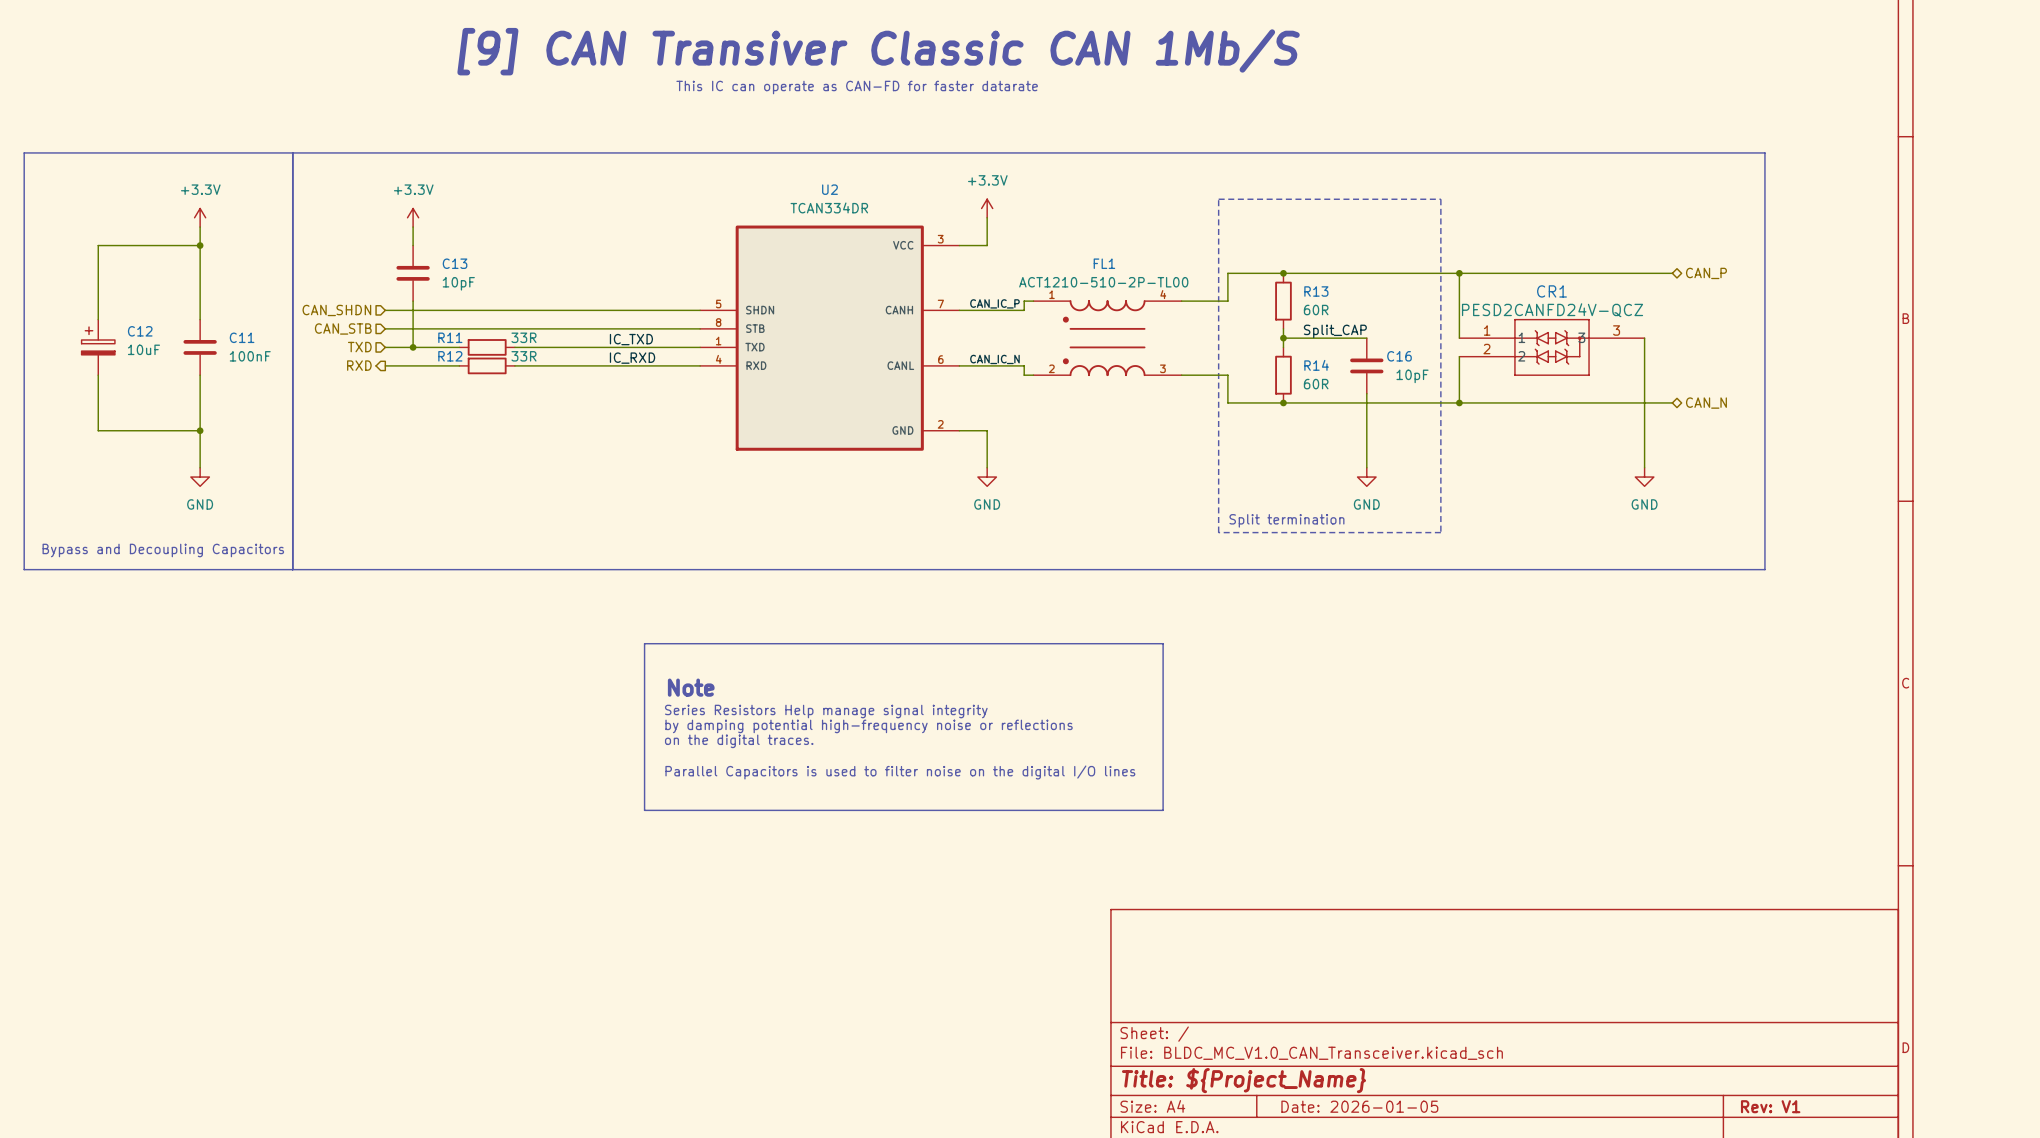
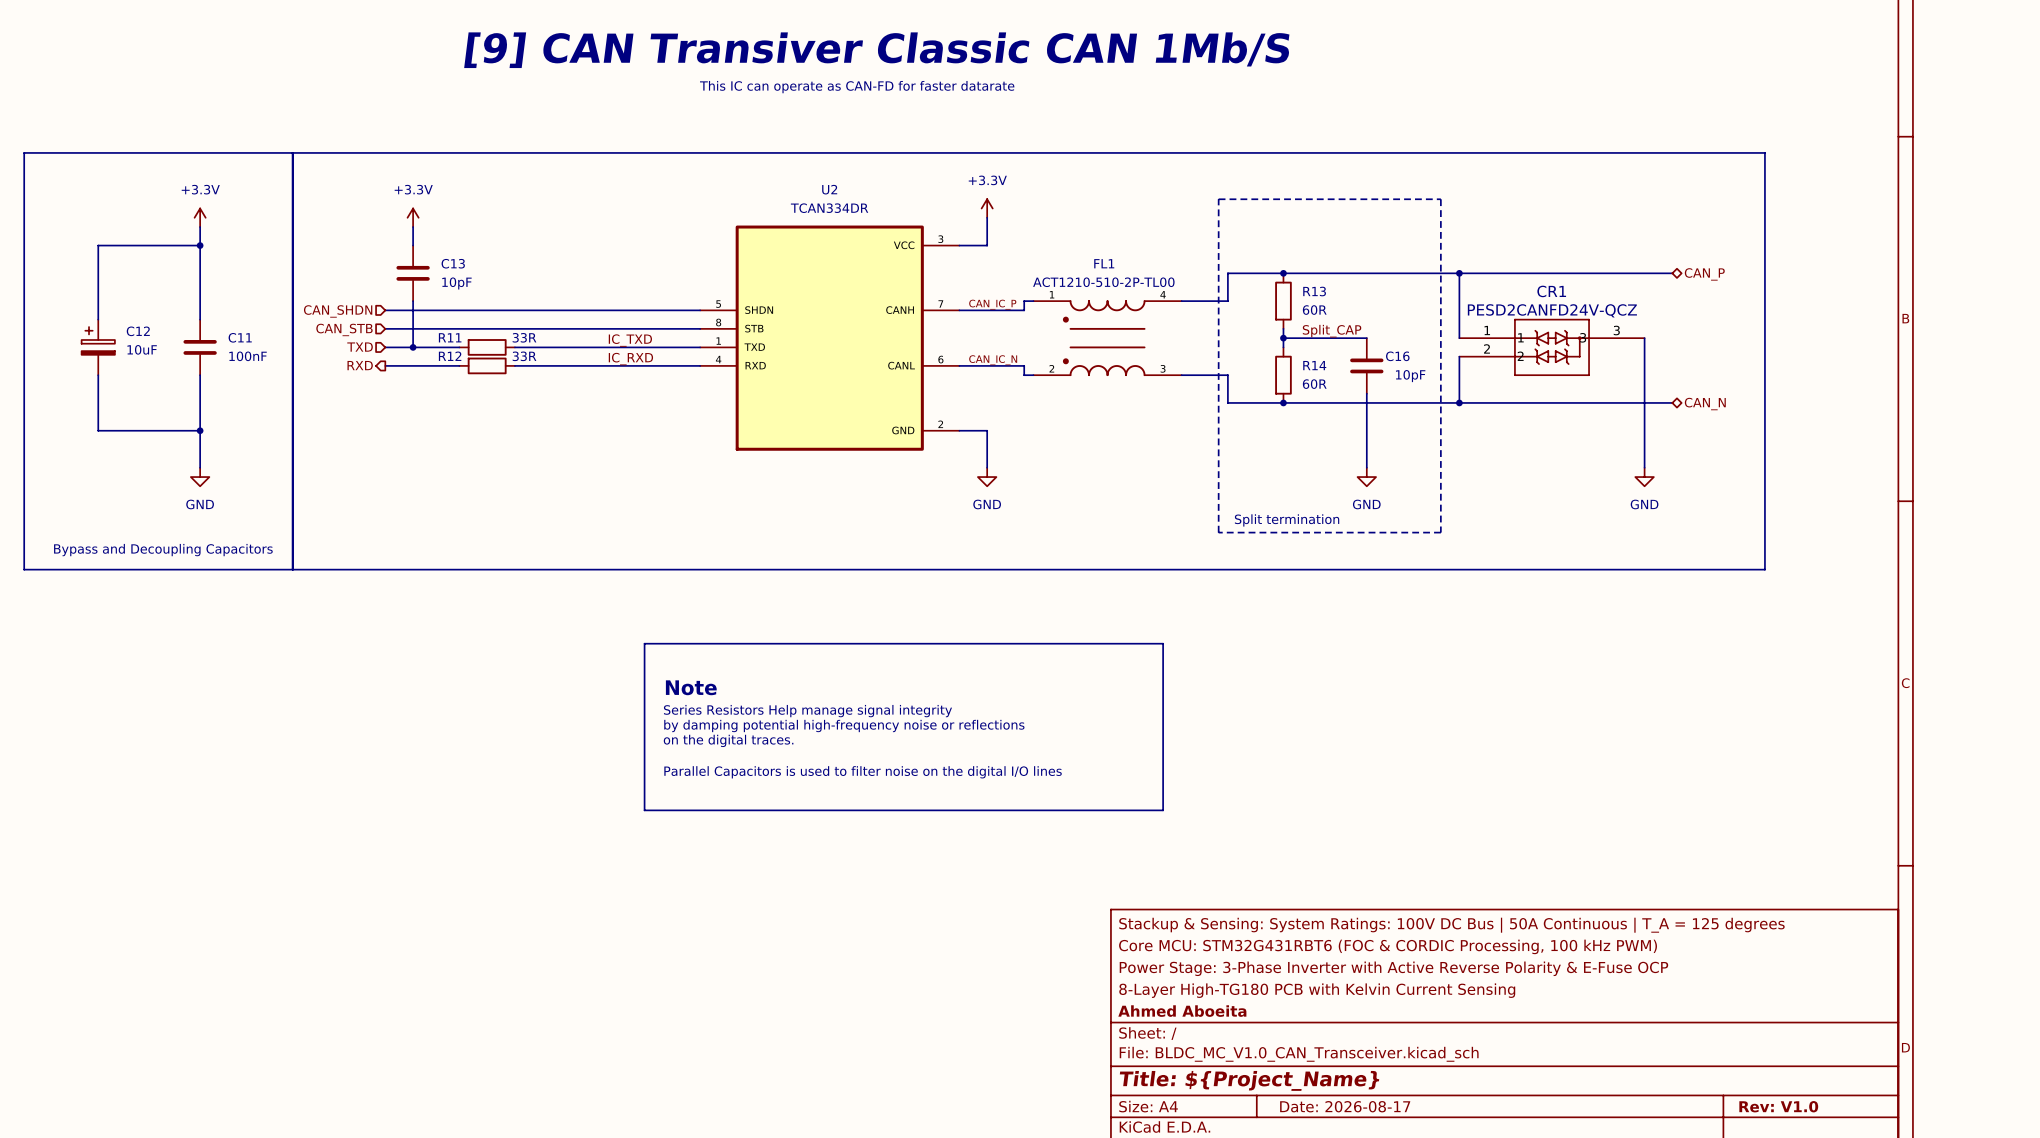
title block: none -> Stackup & Sensing: System Ratings: 100V DC Bus | 50A Continuous | T_A = 125 degrees (1451, 925)
title block: none -> Core MCU: STM32G431RBT6 (FOC & CORDIC Processing, 100 kHz PWM) (1388, 946)
title block: none -> Power Stage: 3-Phase Inverter with Active Reverse Polarity & E-Fuse OCP (1393, 968)
title block: none -> 8-Layer High-TG180 PCB with Kelvin Current Sensing (1317, 990)
title block: none -> Ahmed Aboeita (1182, 1011)
title block: Date: 2026-01-05 (1359, 1106) -> Date: 2026-08-17 (1345, 1106)
title block: Rev: V1 (1770, 1106) -> Rev: V1.0 (1778, 1106)

